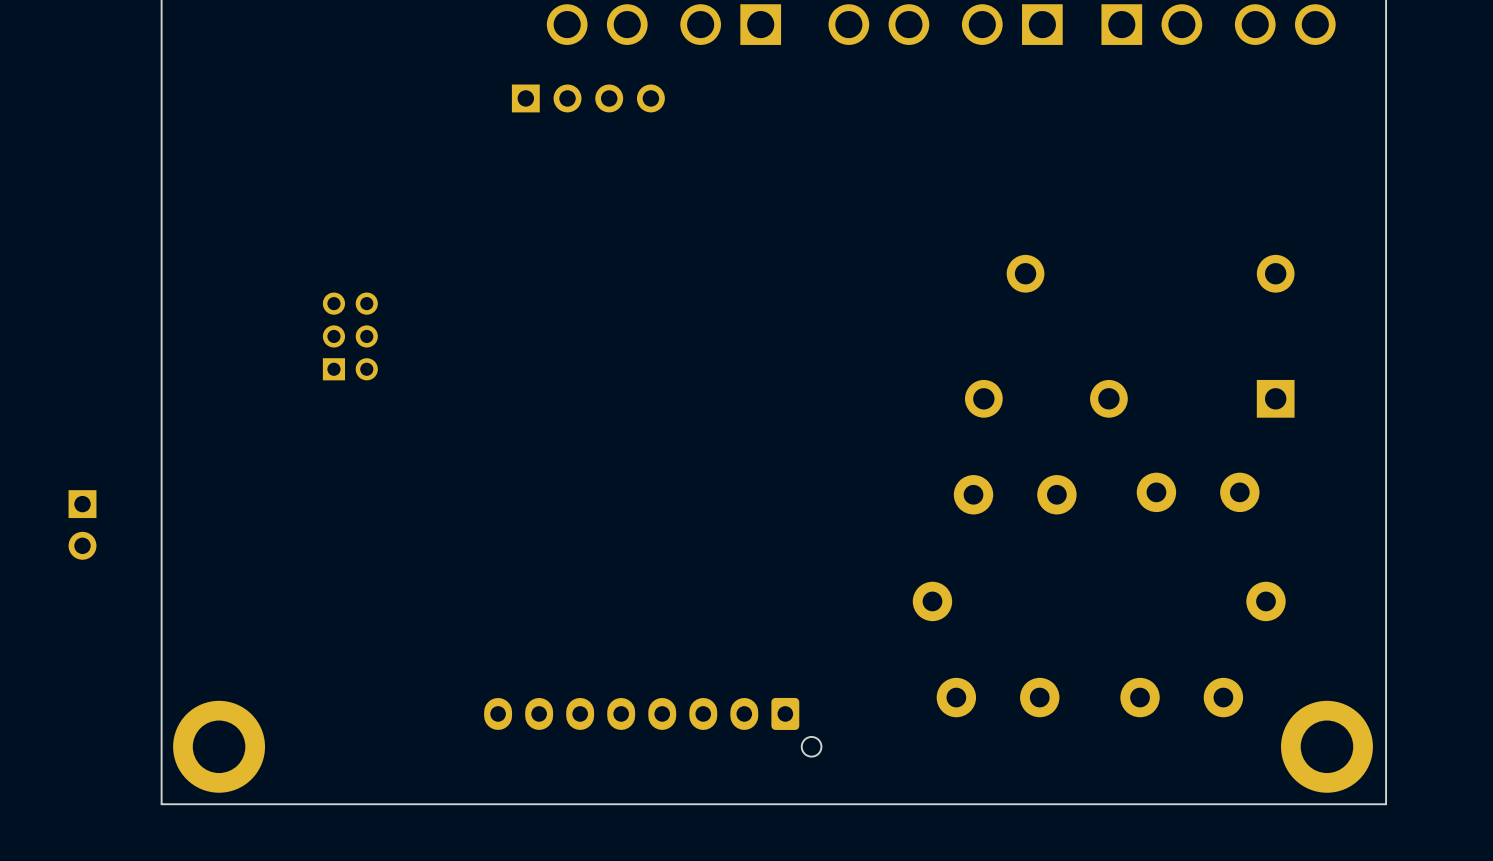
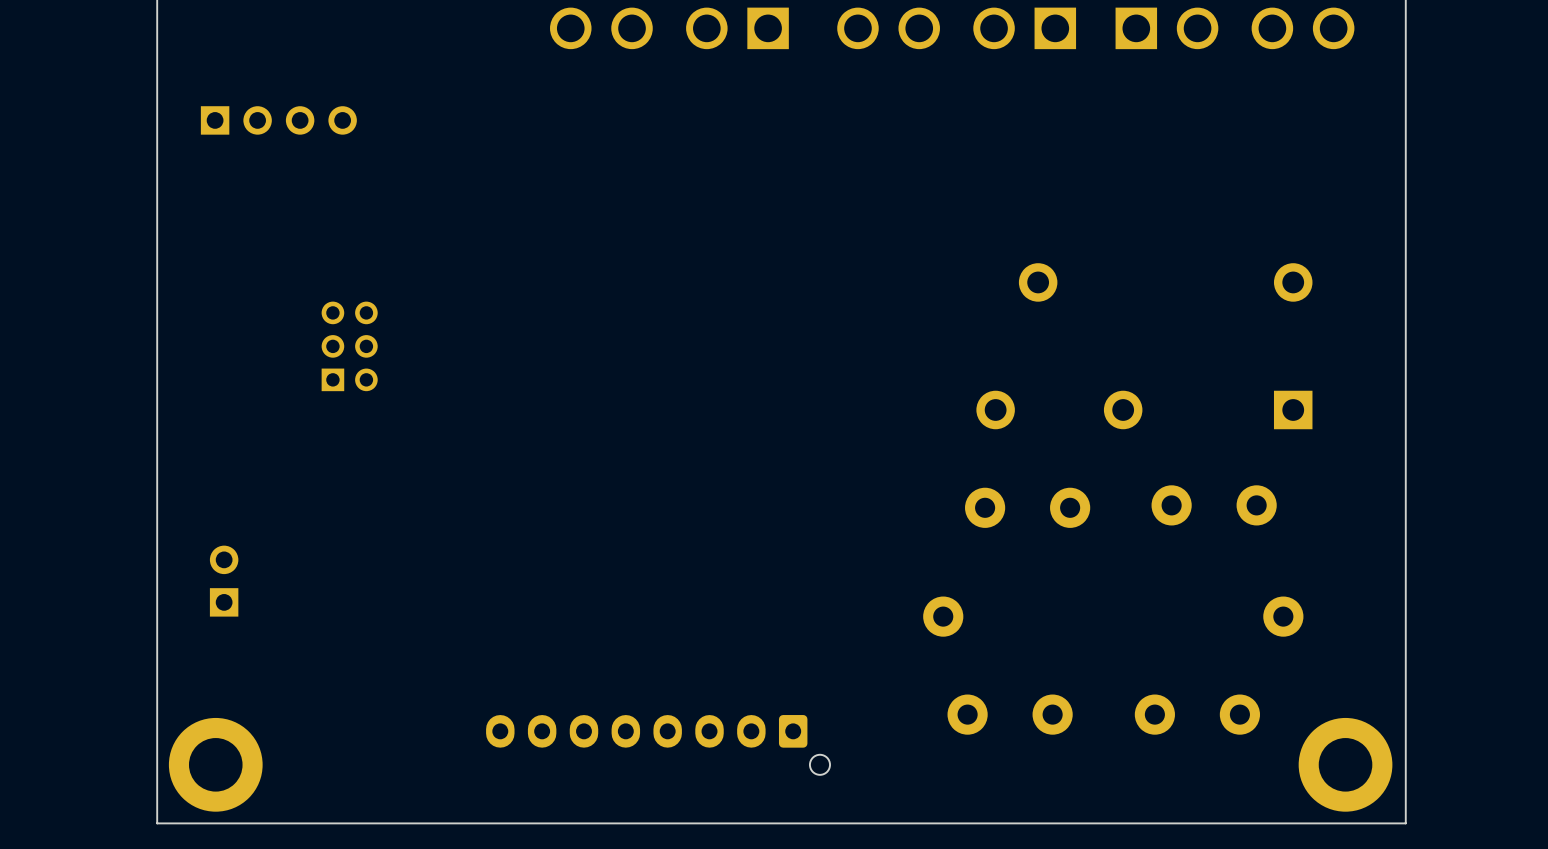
part position: (588, 98) -> (278, 120)
part rotation: 0° (82, 524) -> 180° (224, 581)
part position: (82, 524) -> (224, 581)

